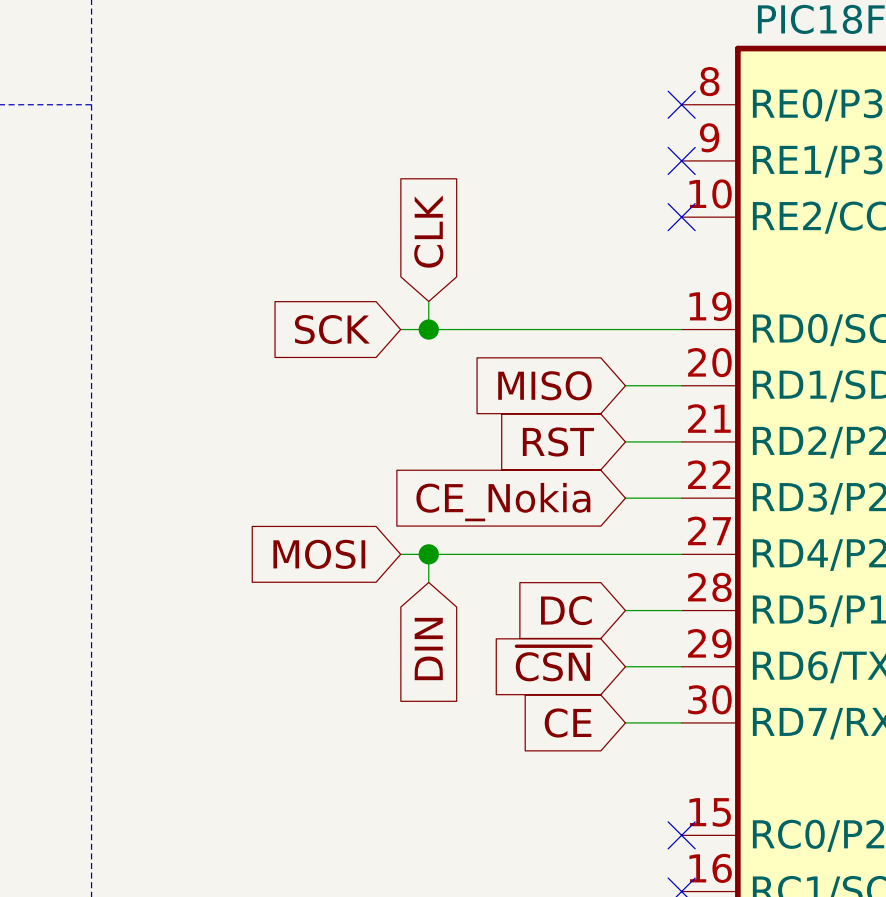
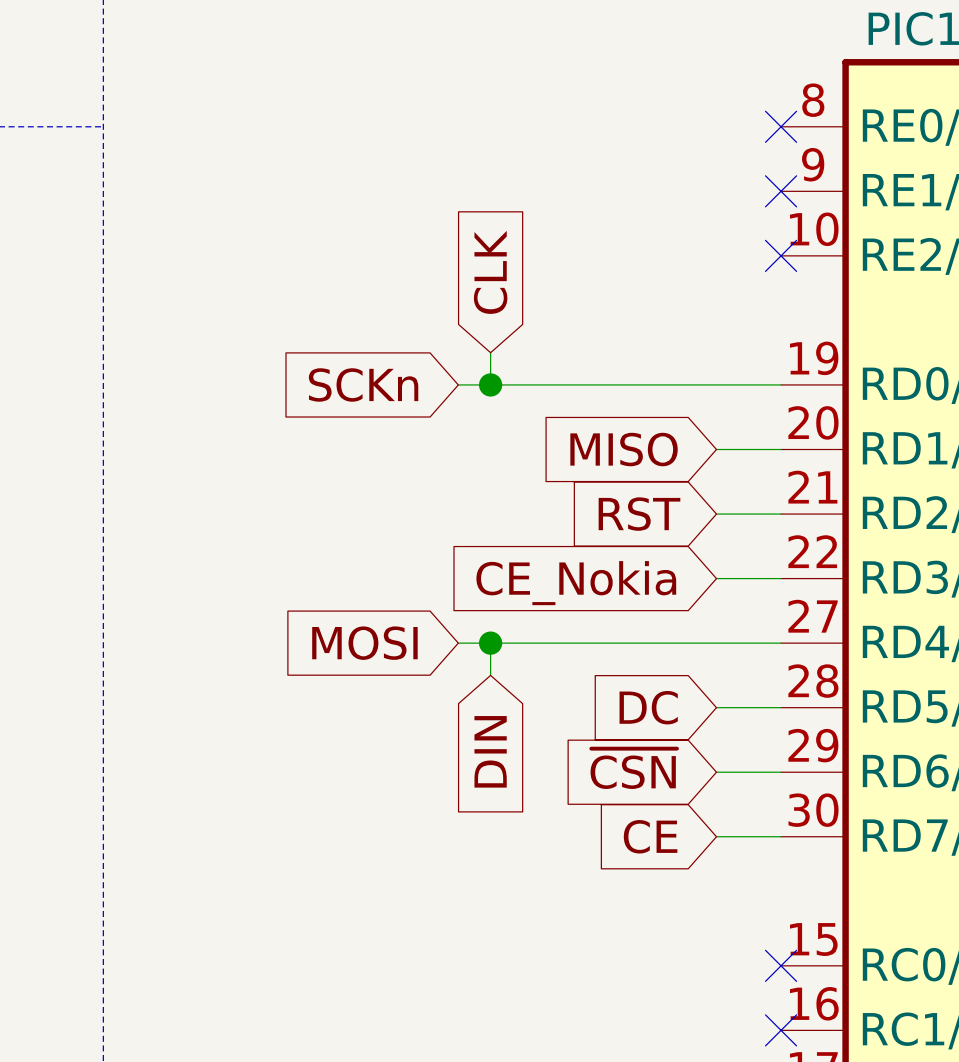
global label: SCK (332, 329) -> SCKn (363, 384)

